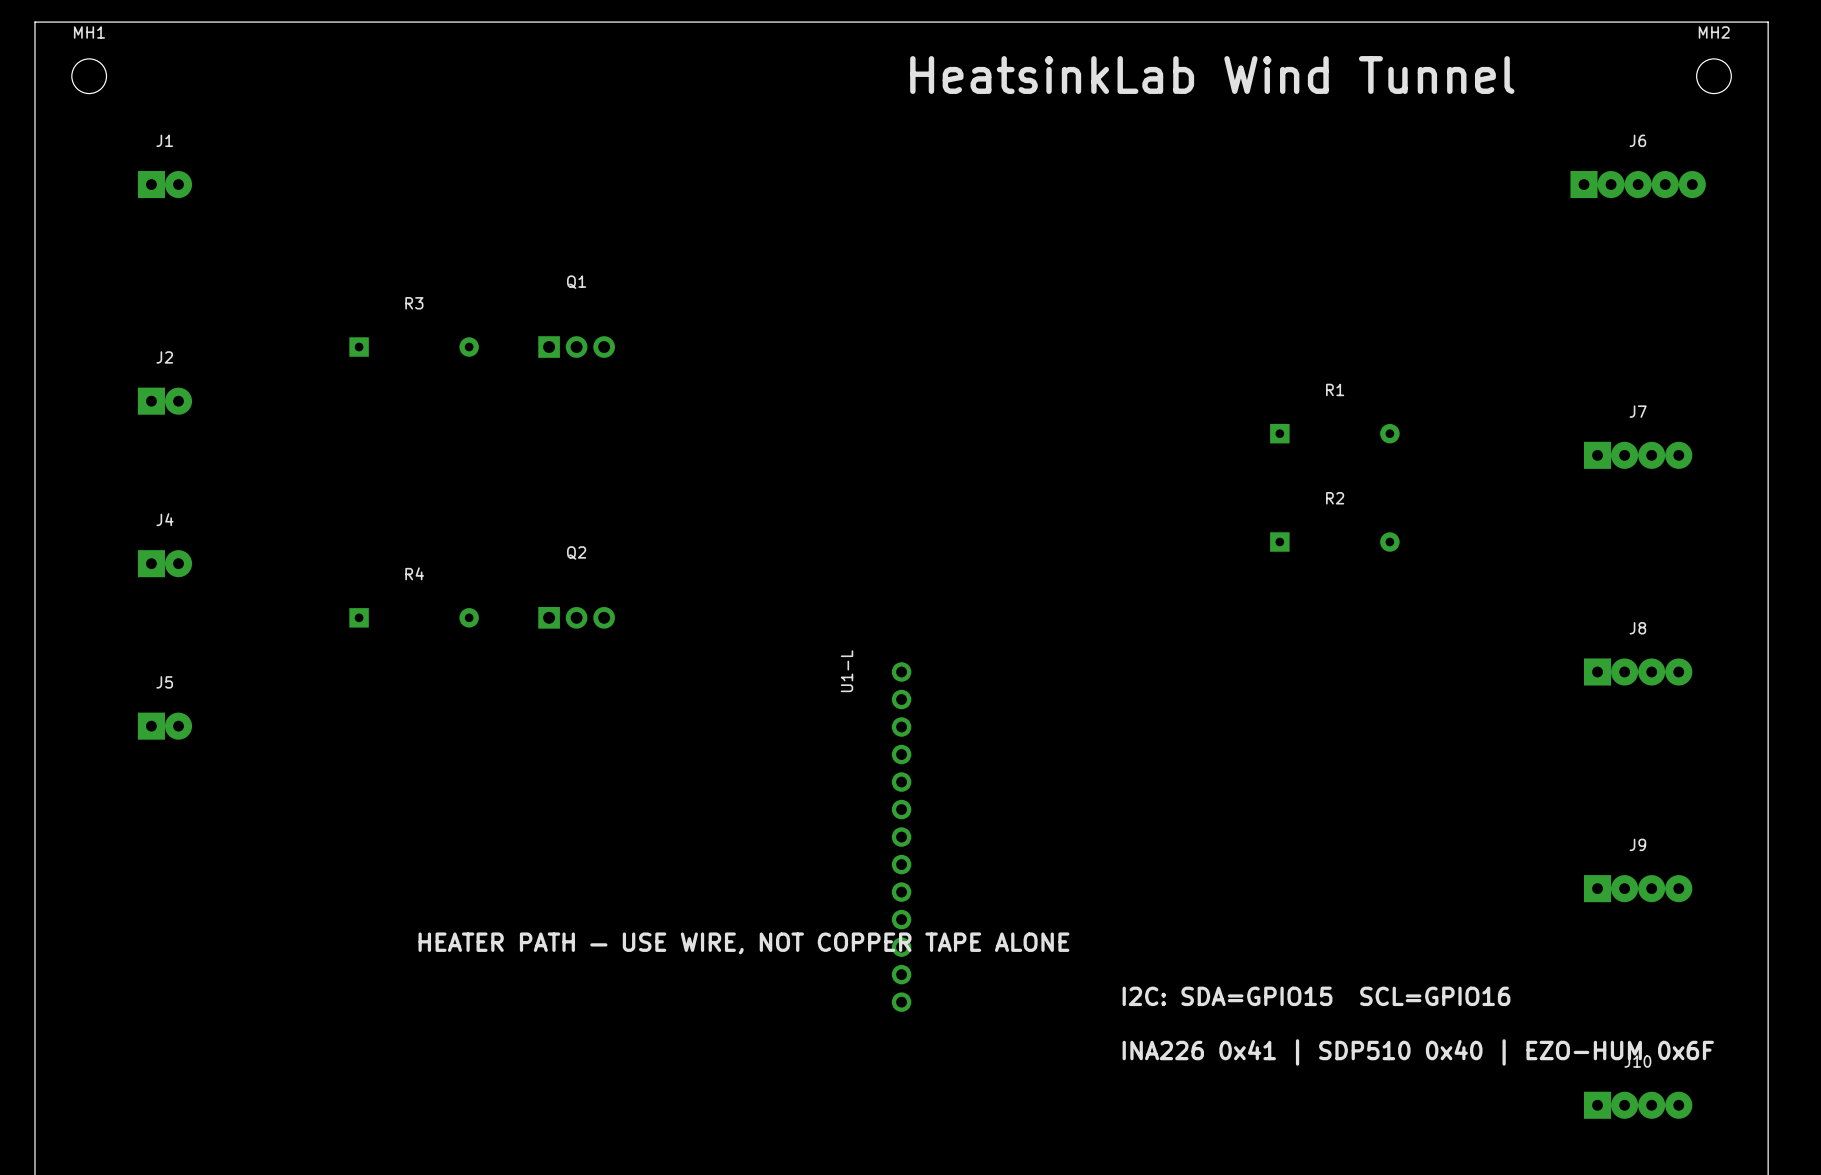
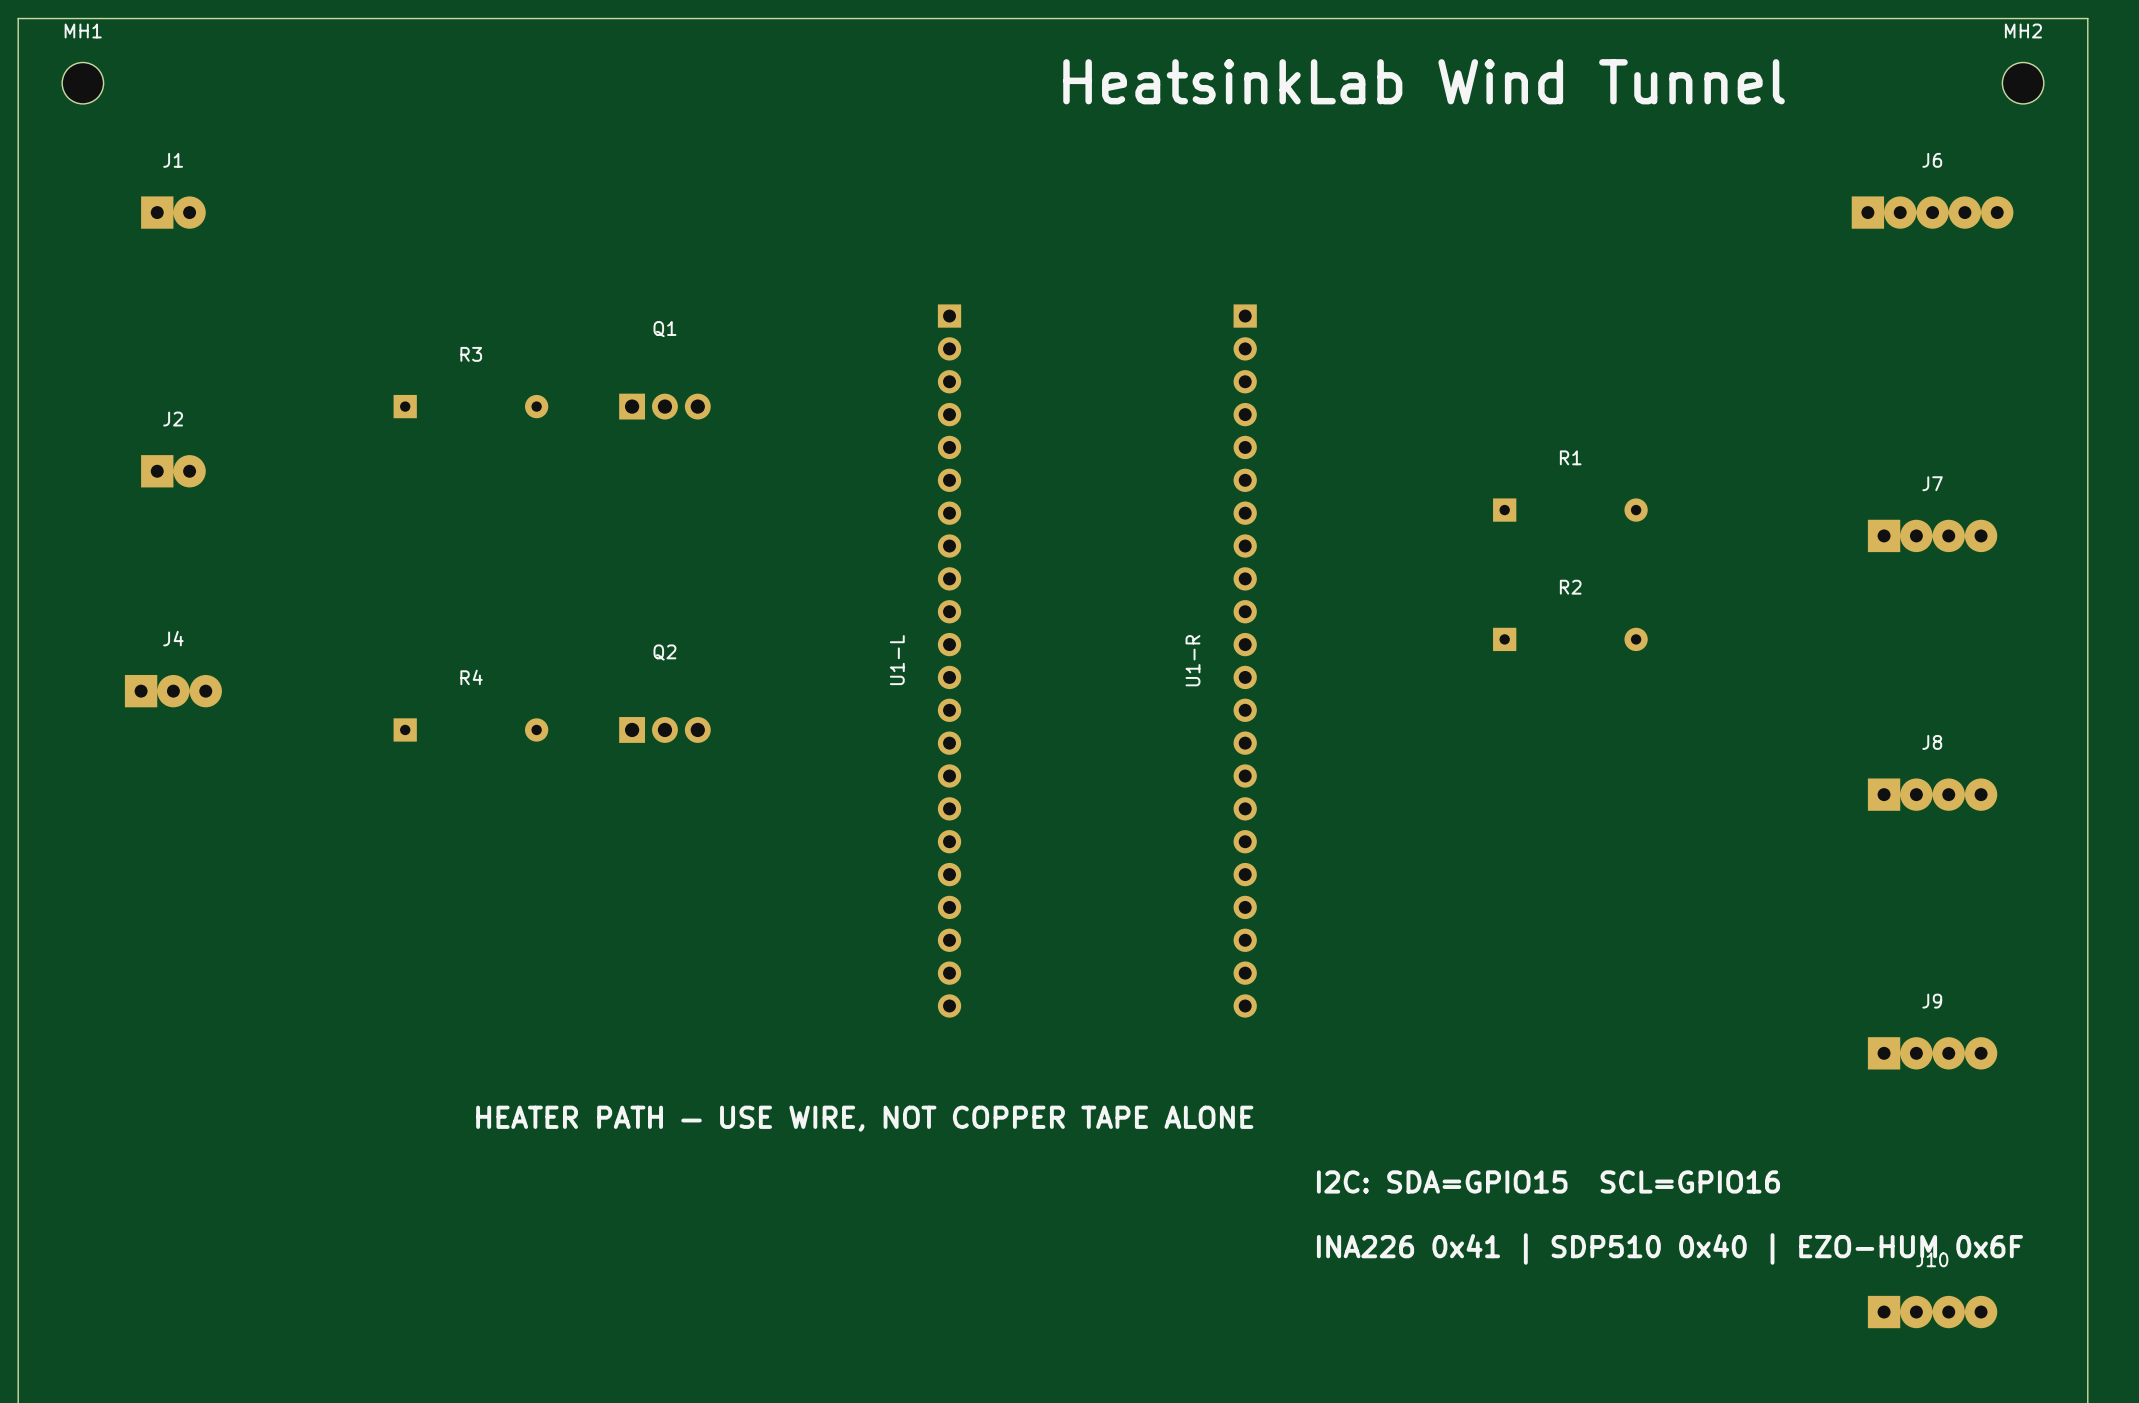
J4 footprint: [137, 550, 193, 578] -> [124, 674, 222, 708]
U1-R: none -> (1245, 661)
U1-L footprint: [891, 662, 912, 1012] -> [937, 304, 962, 1018]
U1-L name position: U1-L (847, 671) -> U1-L (897, 660)
J5: (164, 726) -> none

